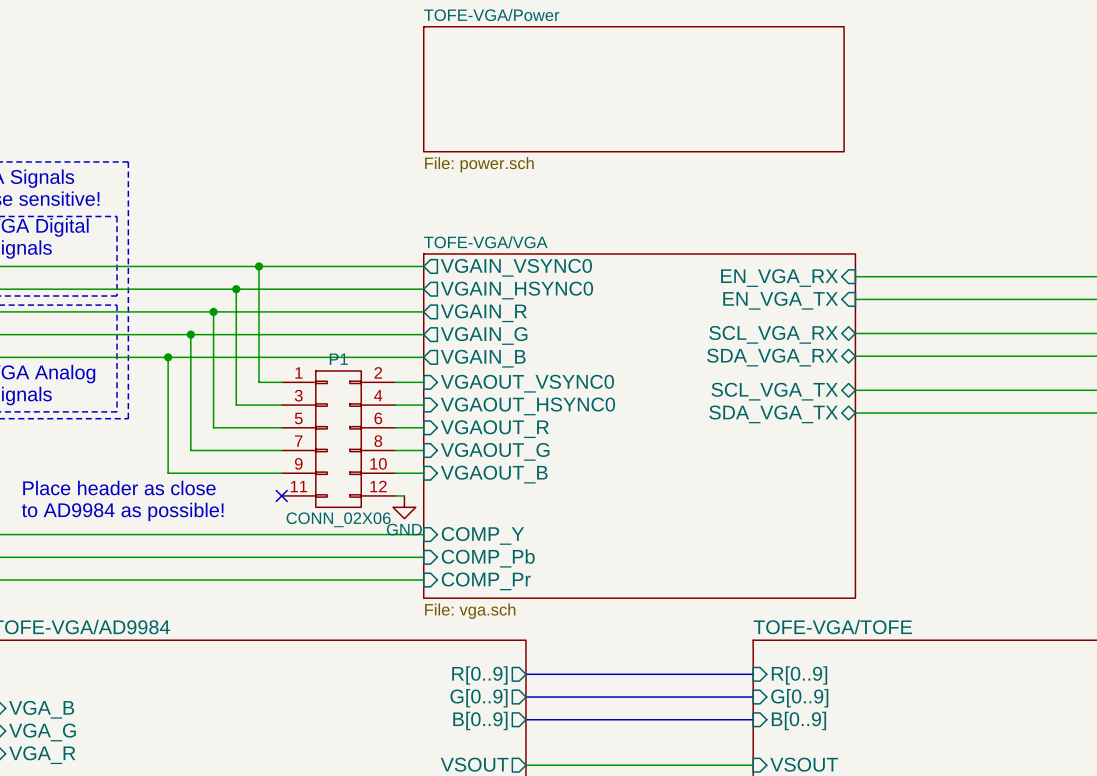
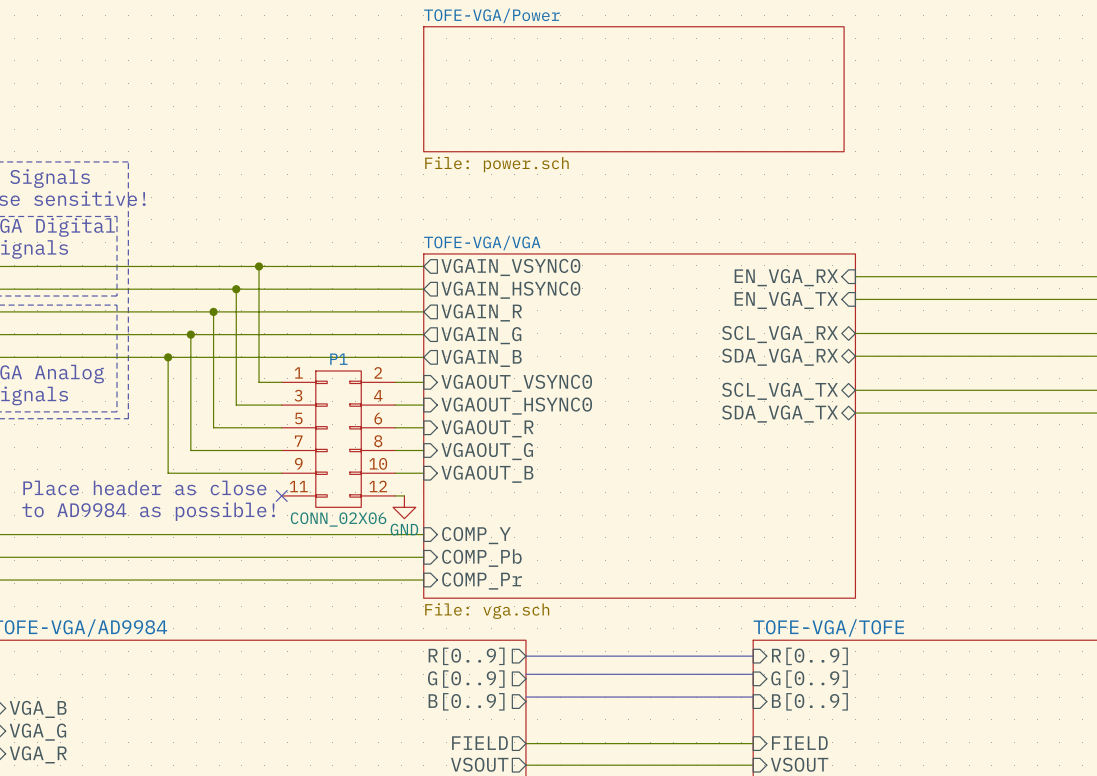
sheet pin: none -> R[0..9] (466, 656)
sheet pin: none -> R[0..9] (809, 656)
sheet pin: R[0..9] (479, 675) -> G[0..9] (466, 679)
sheet pin: R[0..9] (799, 675) -> G[0..9] (809, 679)
sheet pin: G[0..9] (478, 698) -> B[0..9] (466, 701)
sheet pin: G[0..9] (799, 698) -> B[0..9] (809, 701)
bus: (525, 719) (753, 719) -> (525, 656) (753, 656)
sheet pin: B[0..9] (480, 720) -> none
sheet pin: B[0..9] (798, 720) -> none
sheet pin: none -> FIELD (479, 743)
wire: none -> (525, 743) (753, 743)
sheet pin: none -> FIELD (799, 743)

